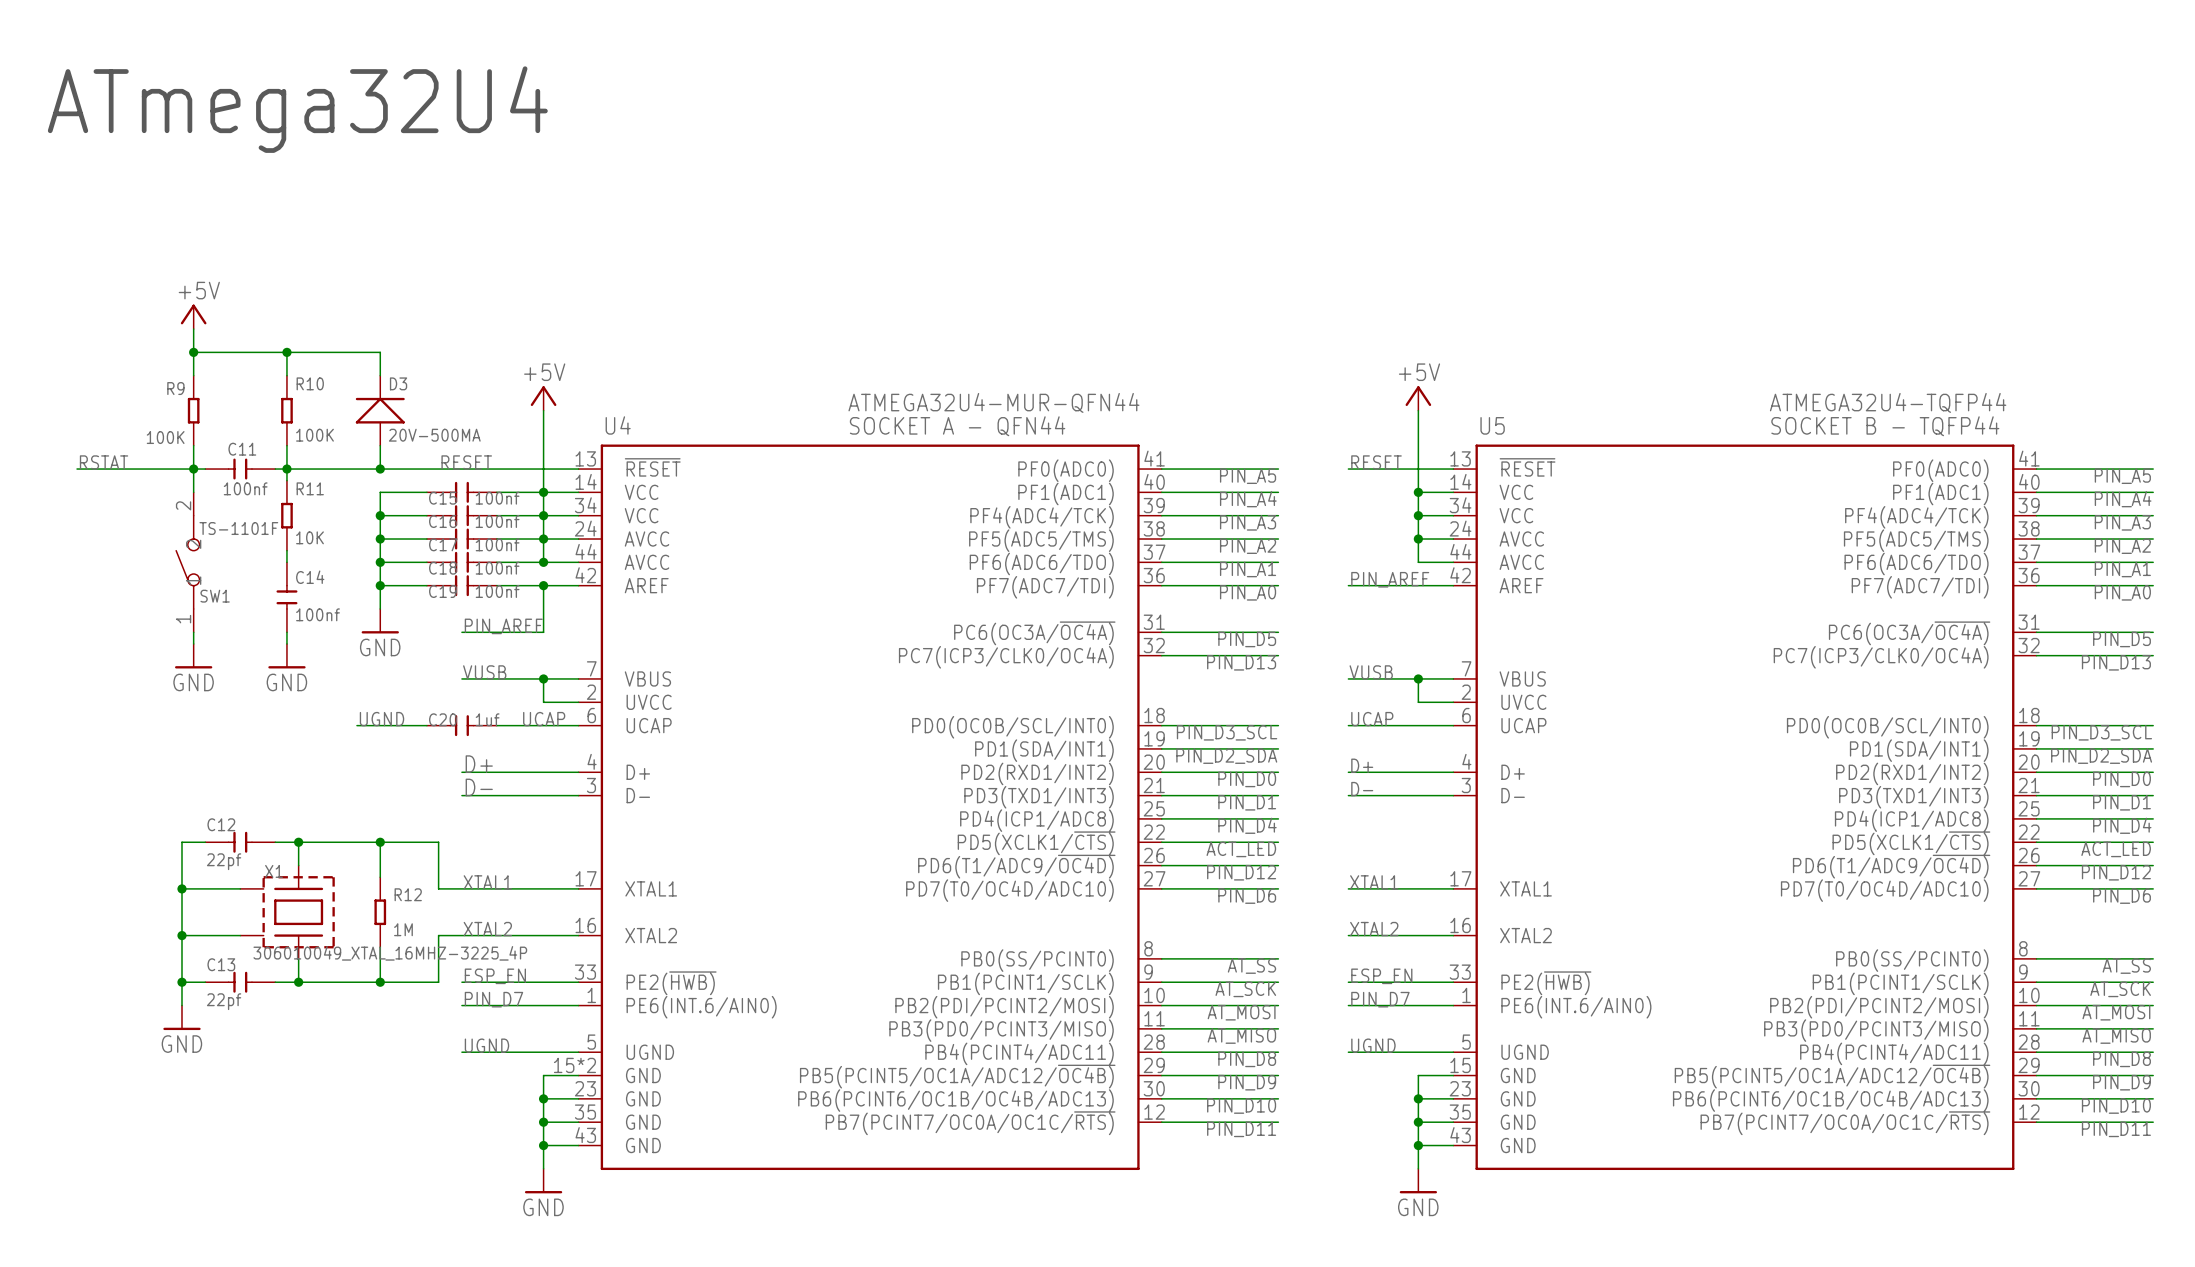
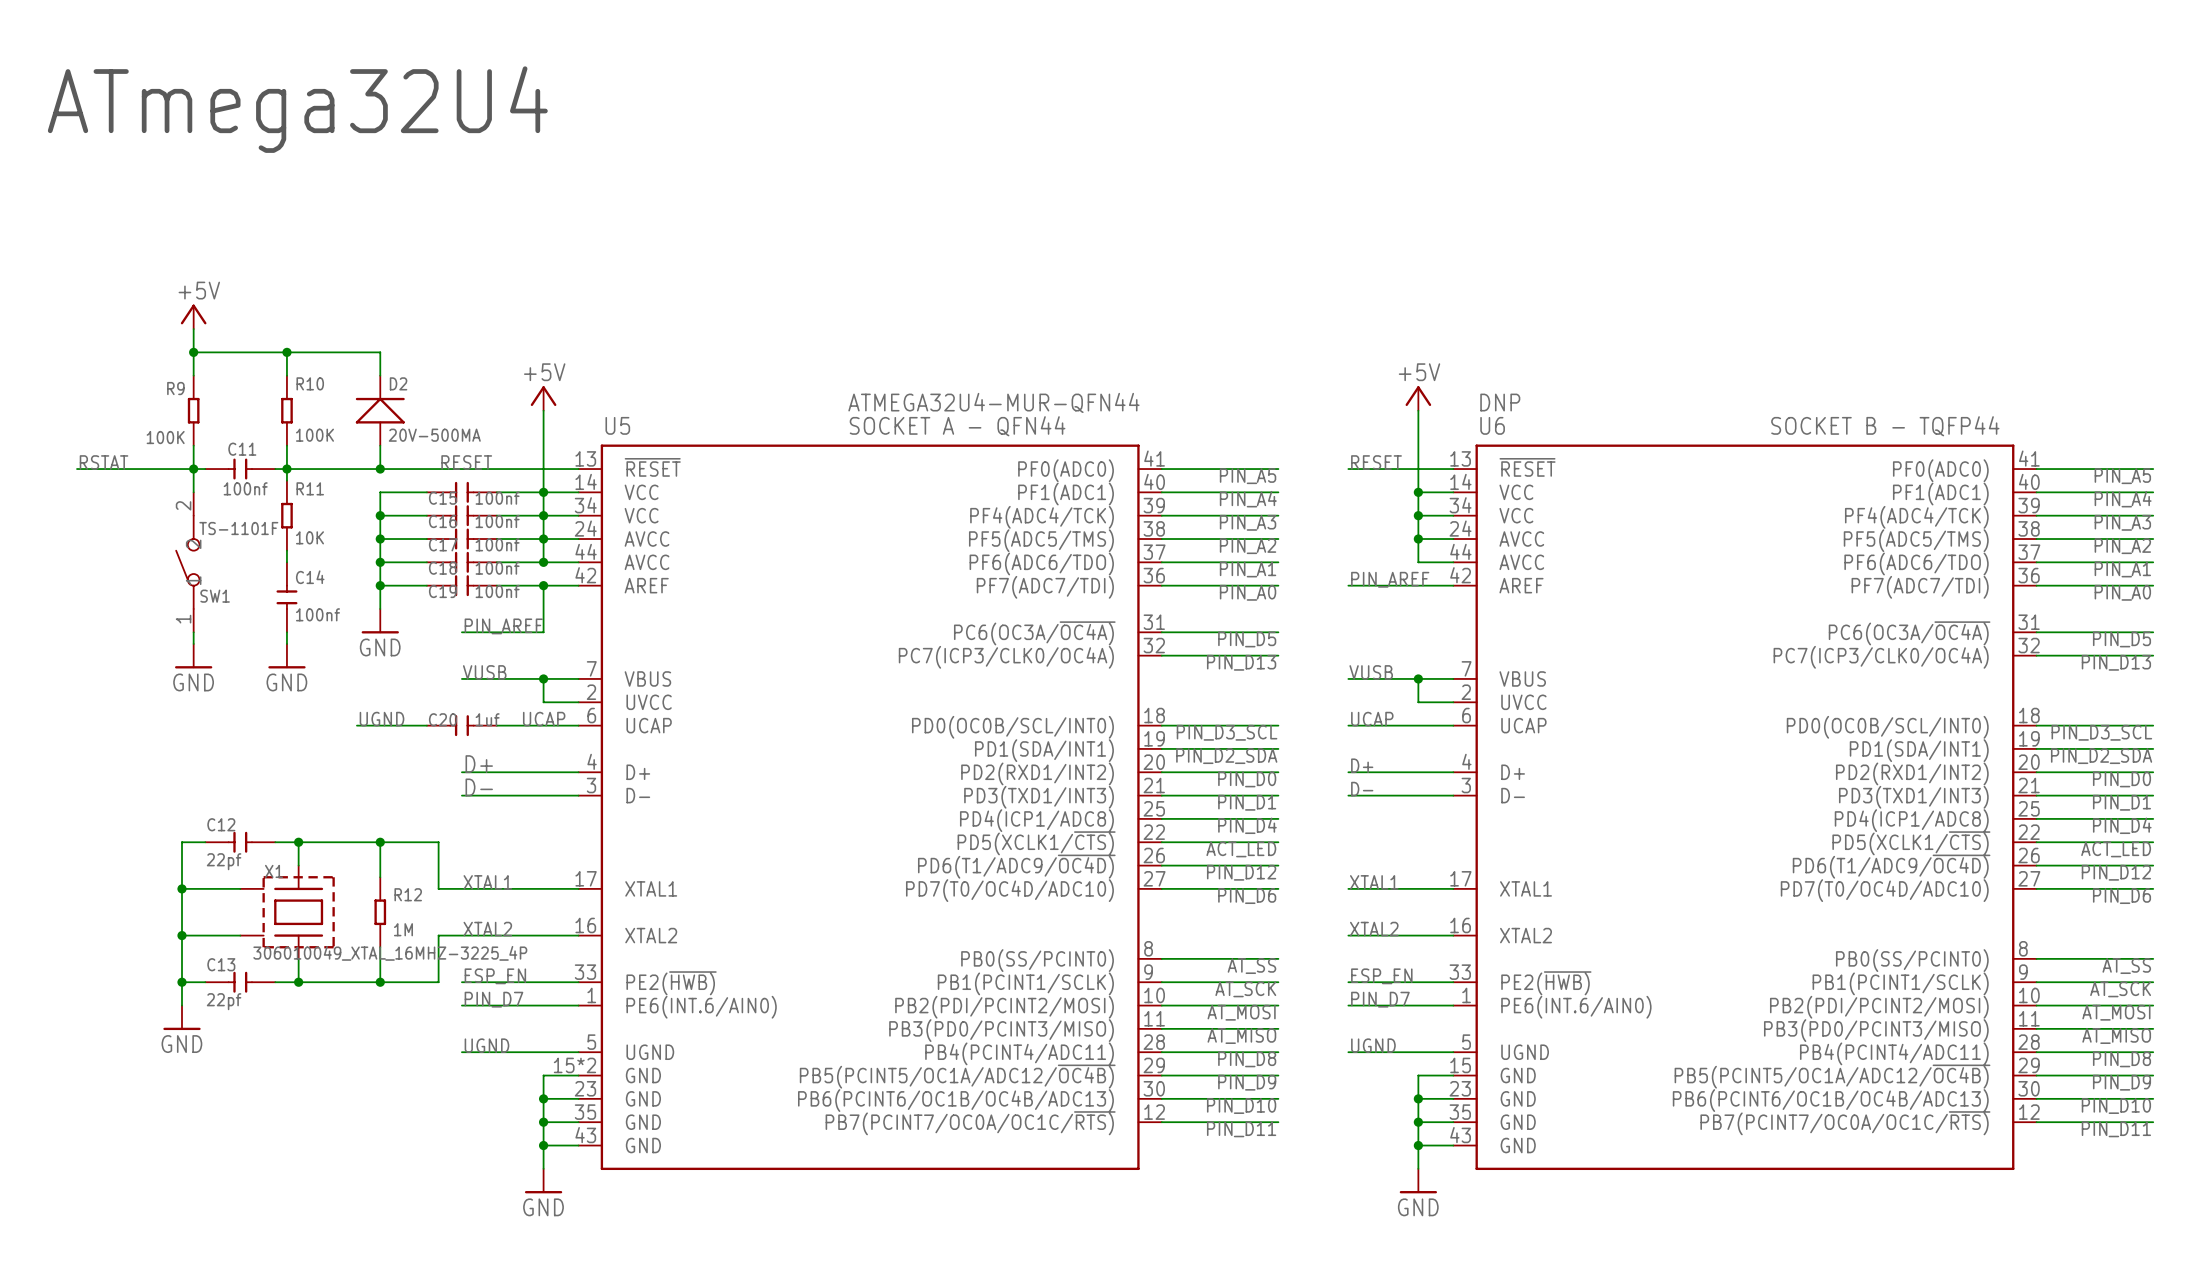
D3 name: D3 (398, 383) -> D2 (398, 383)
U5 value: ATMEGA32U4-TQFP44 (1888, 402) -> DNP (1500, 402)
U4 name: U4 (618, 425) -> U5 (617, 425)
U5 name: U5 (1492, 425) -> U6 (1492, 425)

